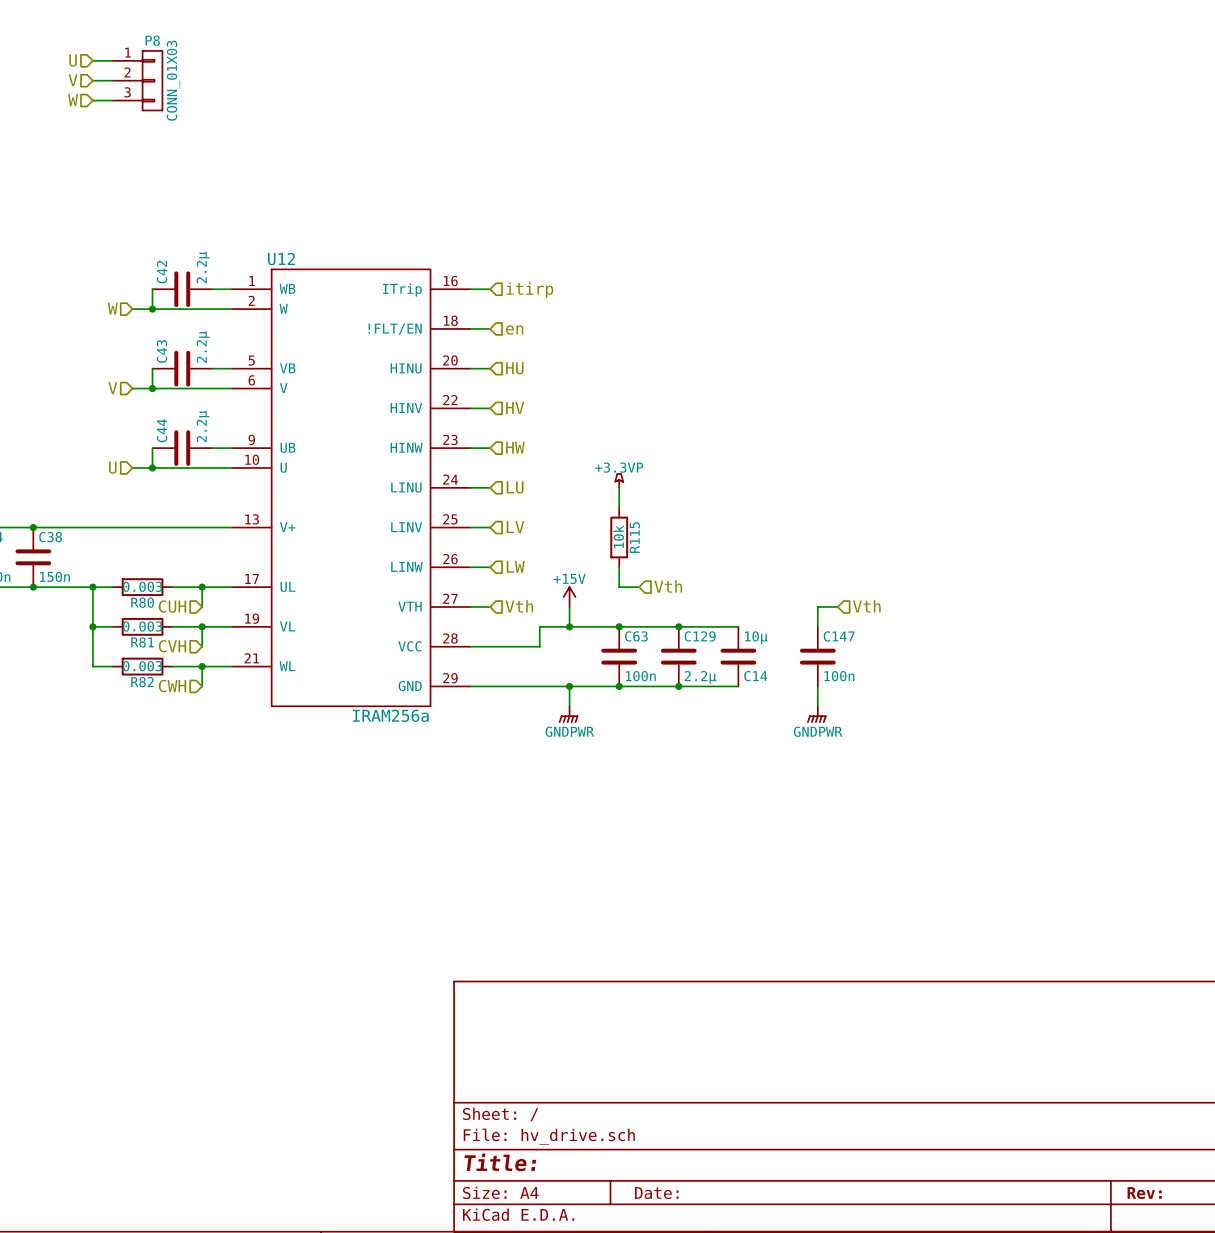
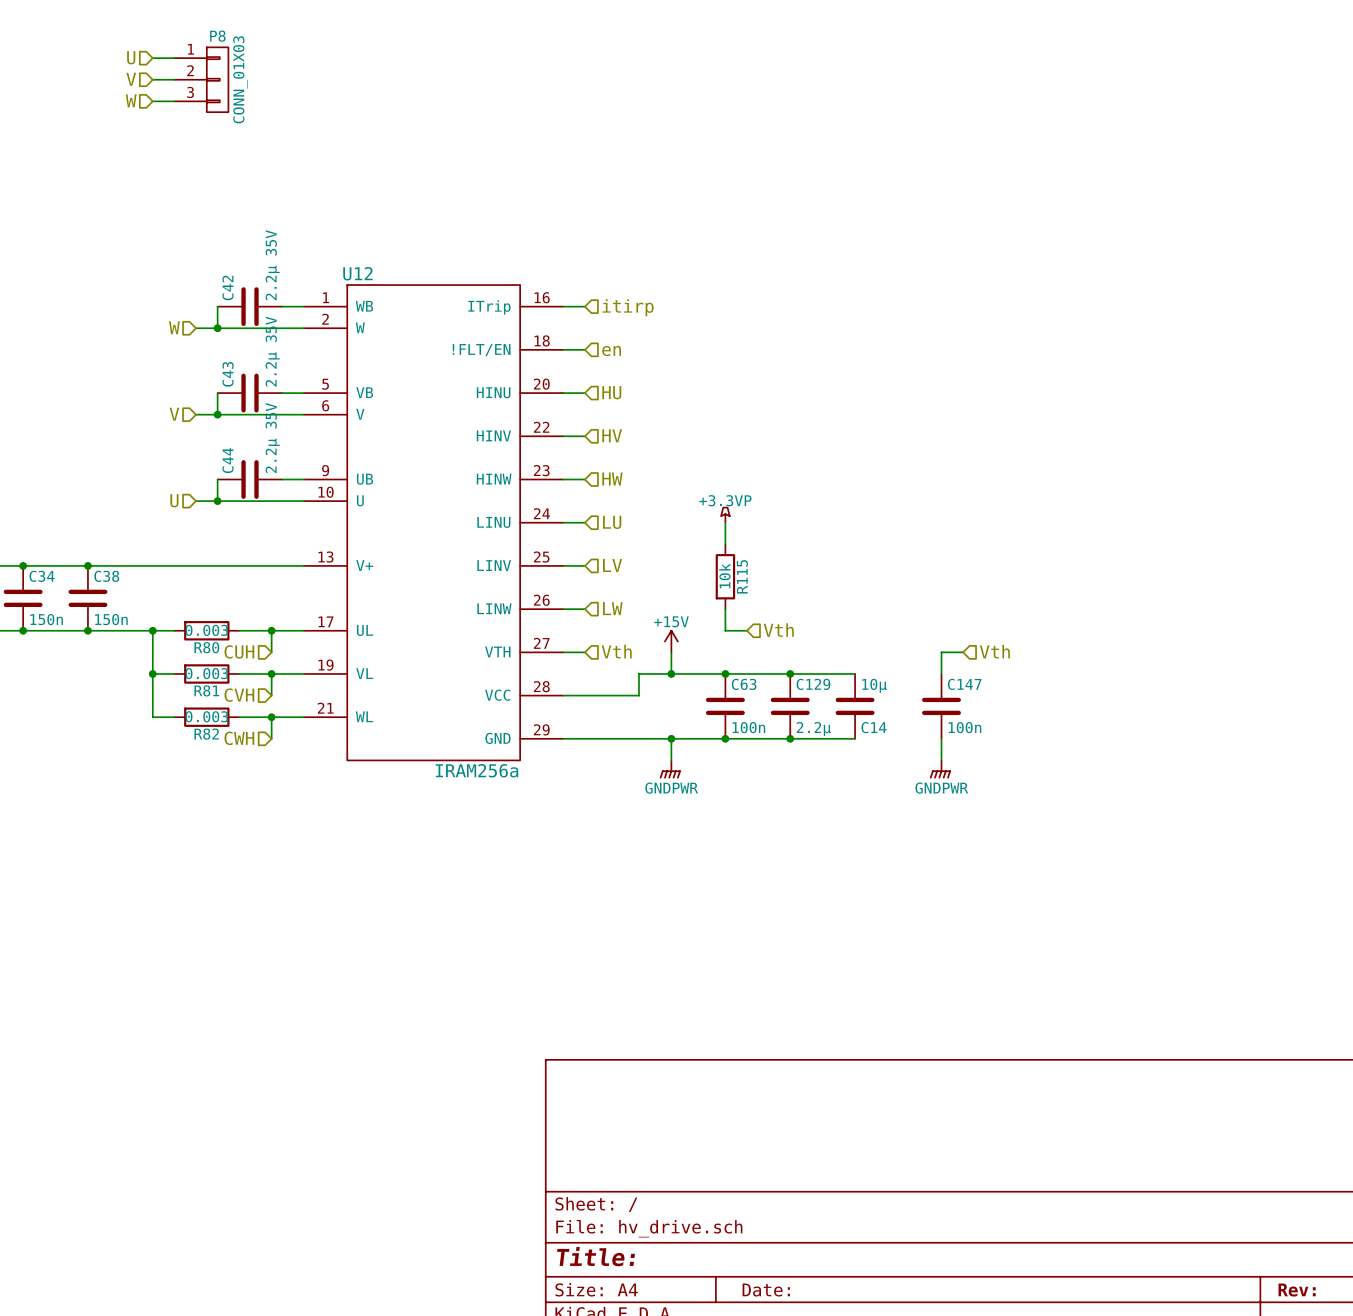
C42 value: 2.2µ (203, 267) -> 2.2µ 35V (272, 265)
C43 value: 2.2µ (203, 346) -> 2.2µ 35V (272, 351)
C44 value: 2.2µ (203, 426) -> 2.2µ 35V (272, 438)

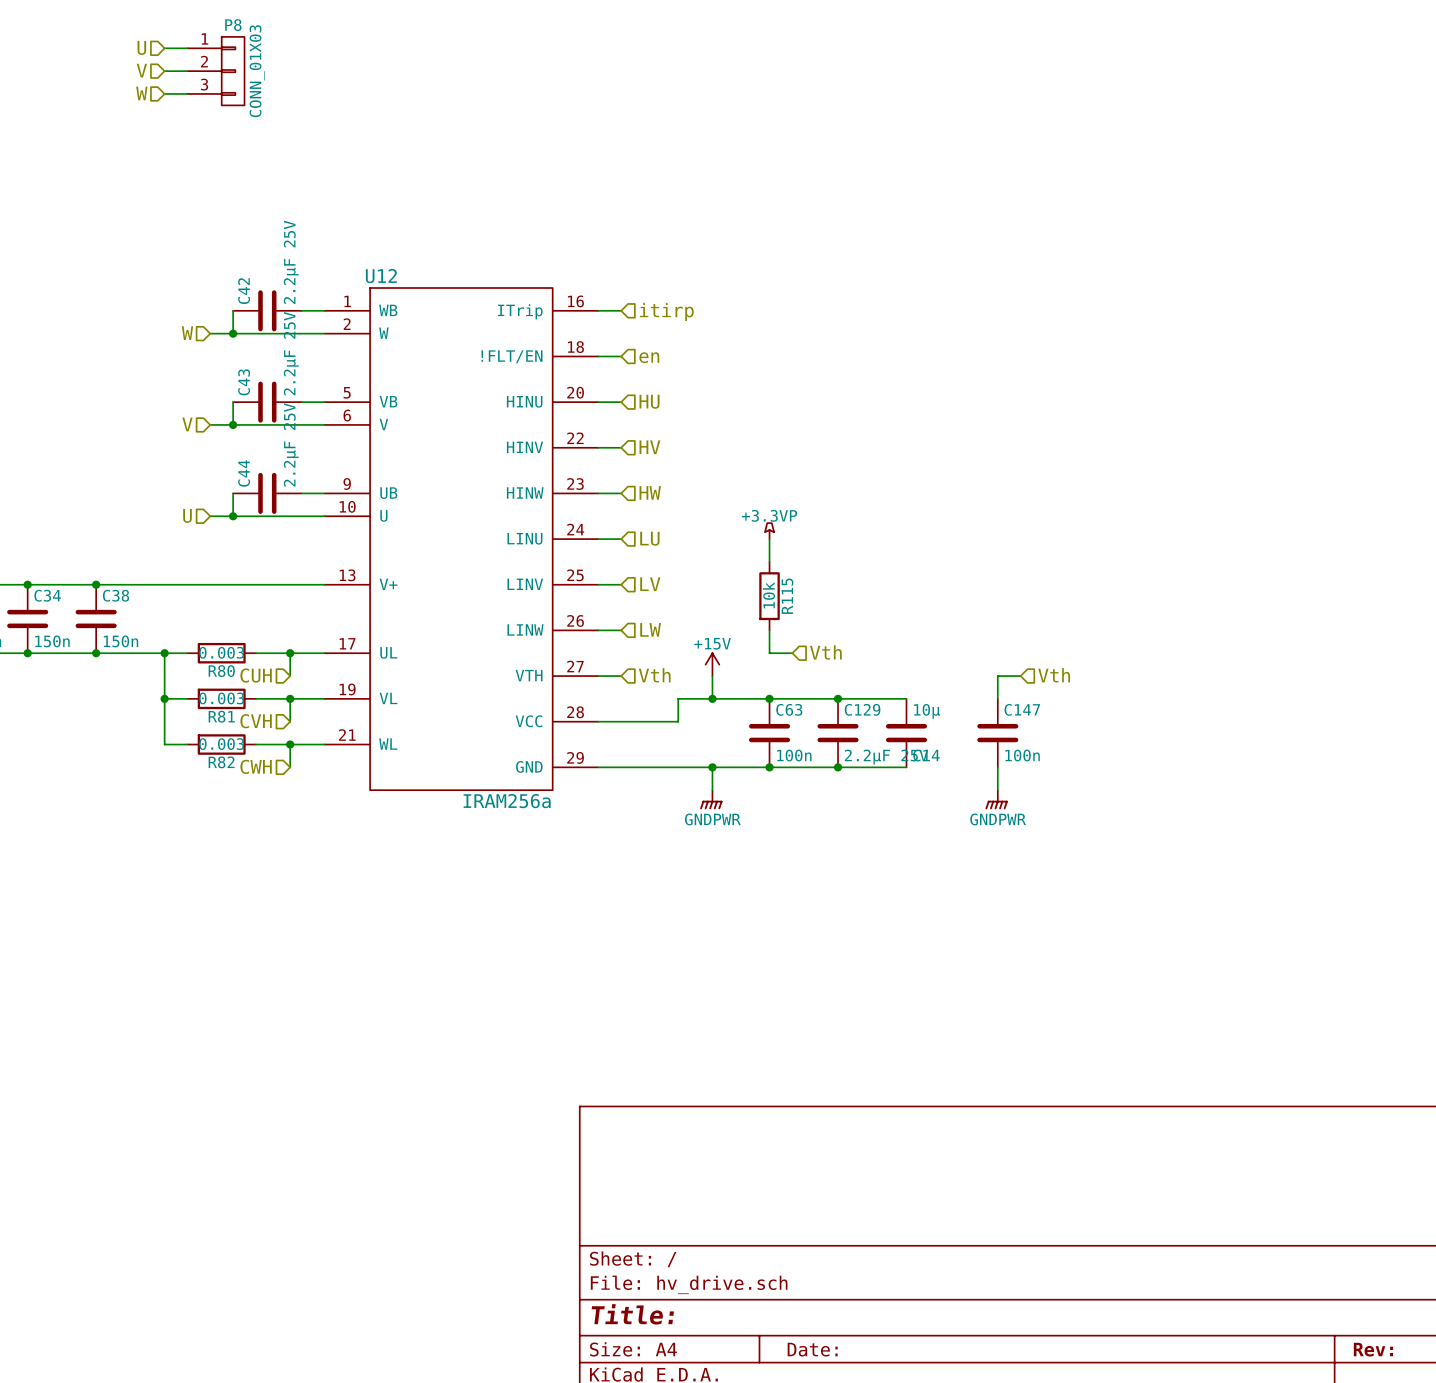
C42 value: 2.2µ 35V (272, 265) -> 2.2µF 25V (291, 262)
C43 value: 2.2µ 35V (272, 351) -> 2.2µF 25V (291, 353)
C44 value: 2.2µ 35V (272, 438) -> 2.2µF 25V (291, 444)
C129 value: 2.2µ (813, 729) -> 2.2µF 25V (886, 757)

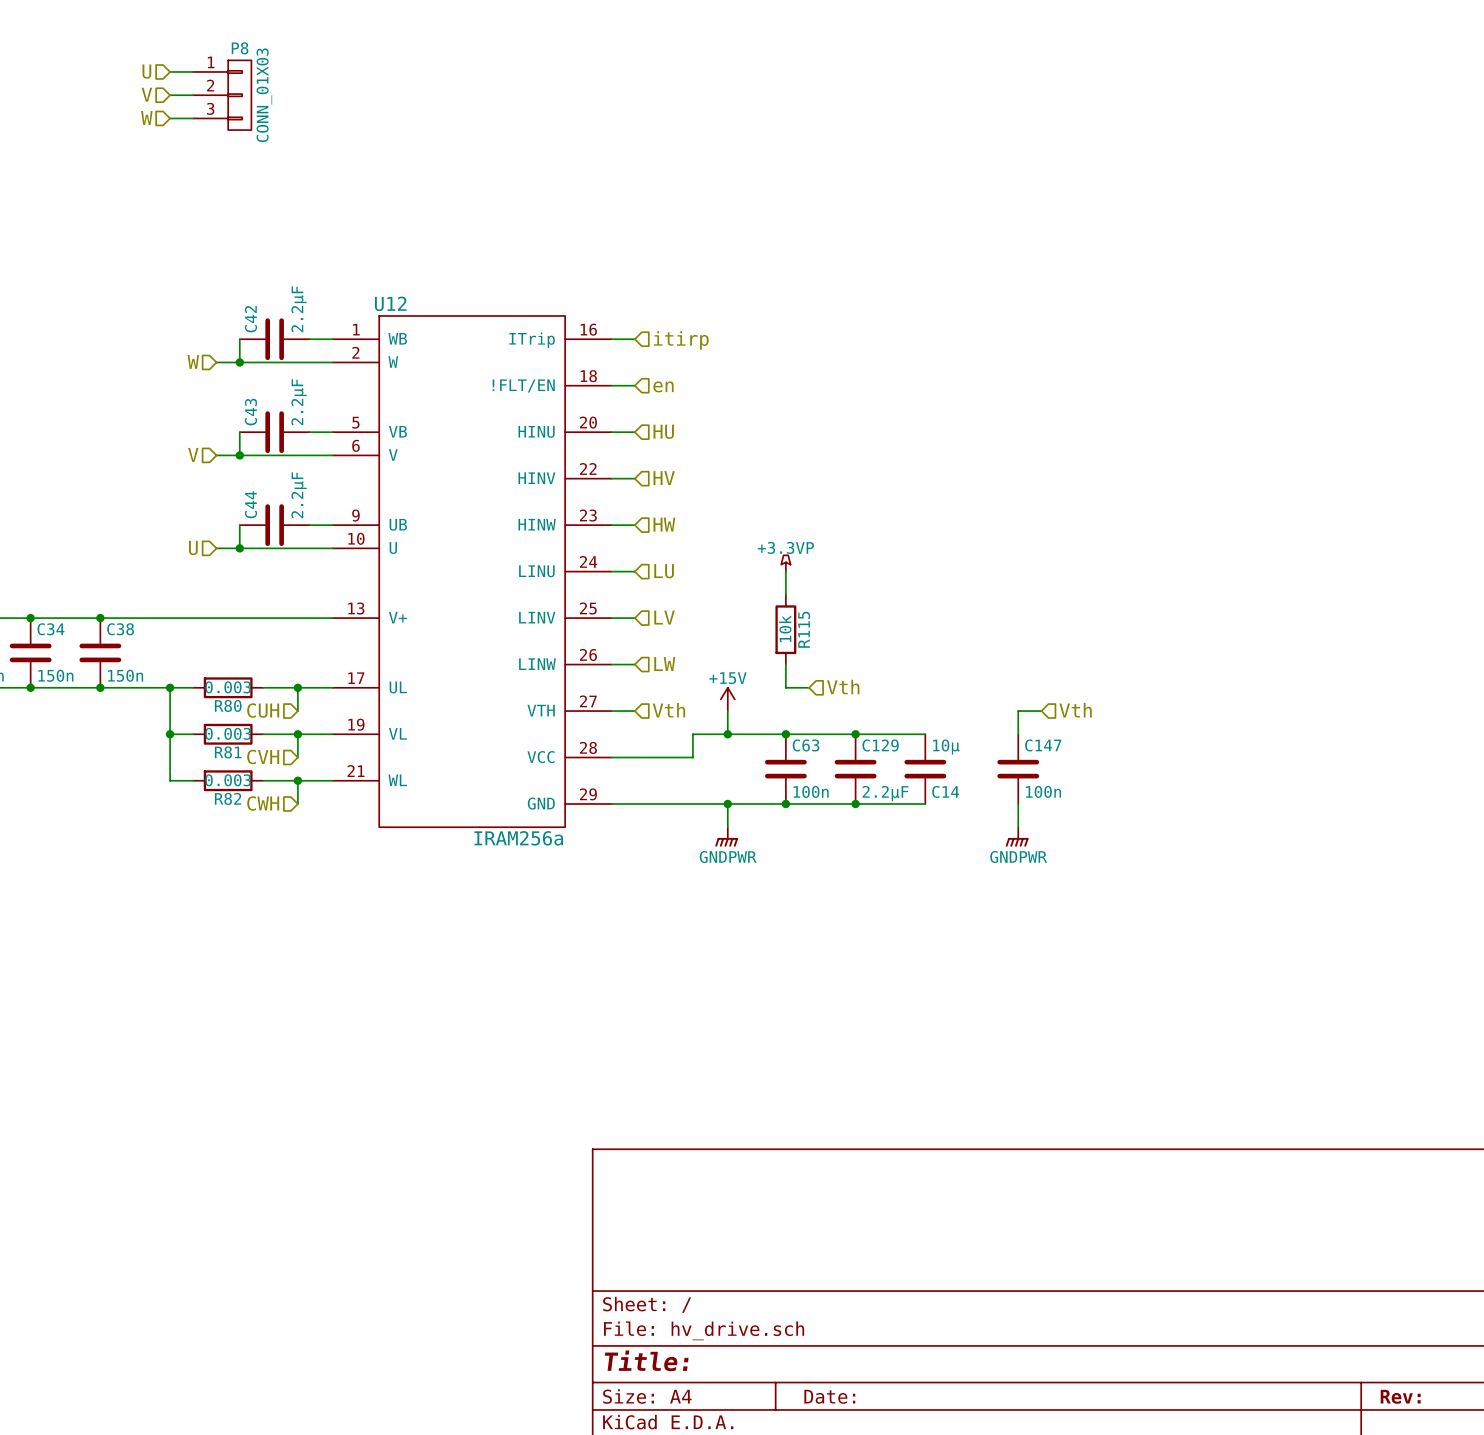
C42 value: 2.2µF 25V (291, 262) -> 2.2µF (299, 309)
C43 value: 2.2µF 25V (291, 353) -> 2.2µF (299, 402)
C44 value: 2.2µF 25V (291, 444) -> 2.2µF (299, 495)
C129 value: 2.2µF 25V (886, 757) -> 2.2µF (885, 793)

